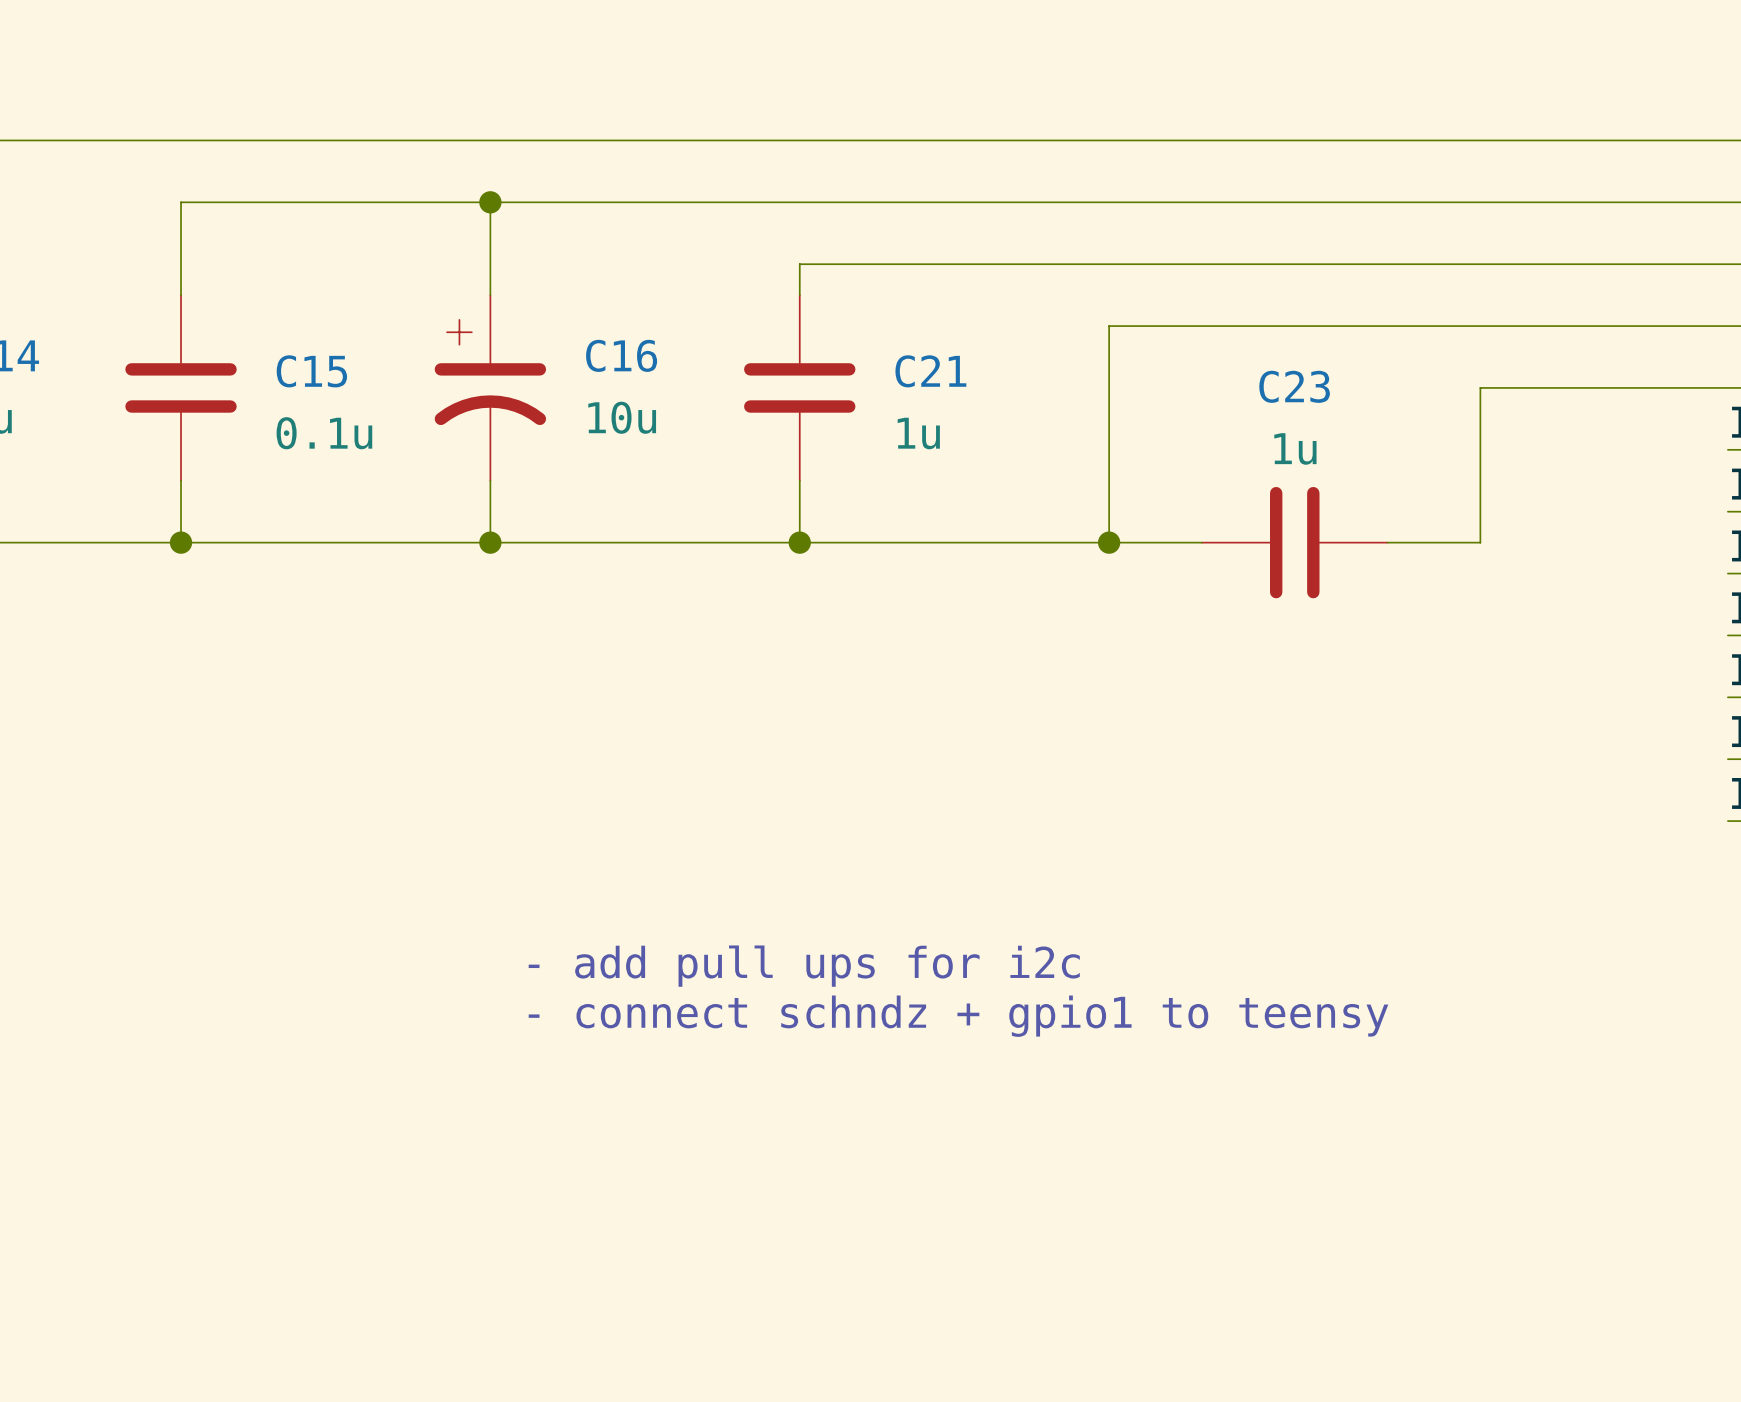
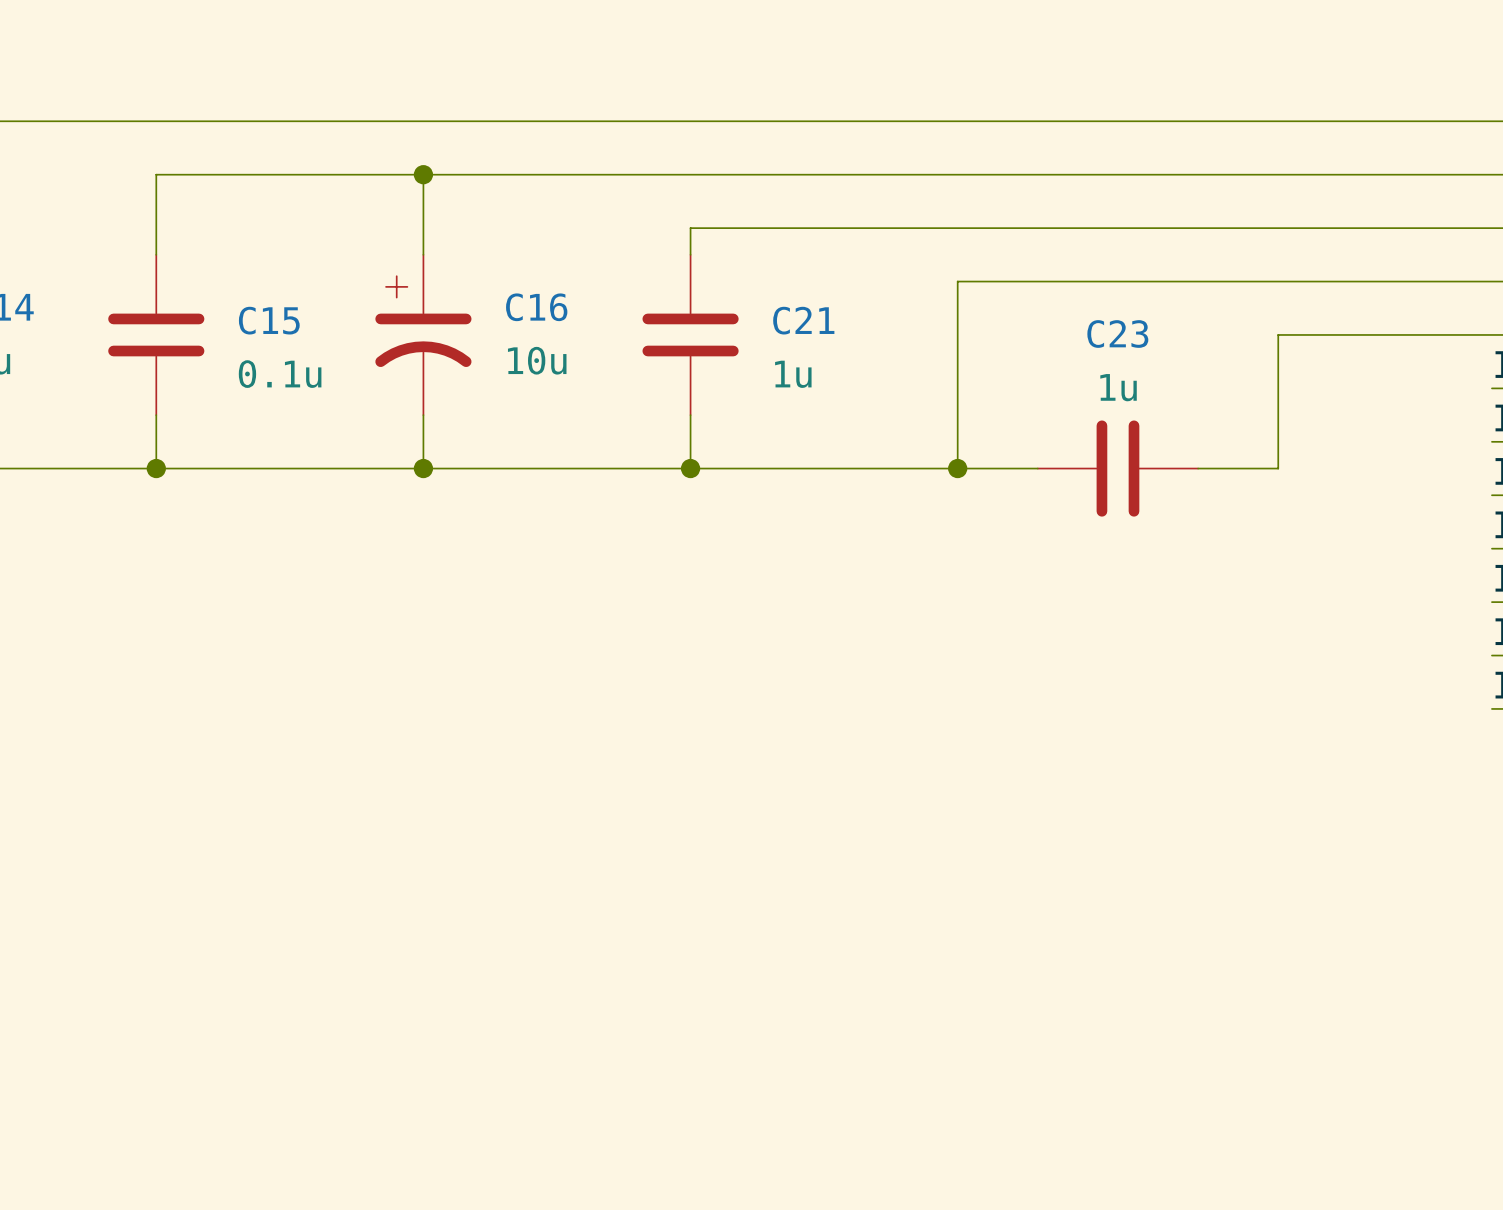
text: - add pull ups for i2c (804, 966) -> none
text: - connect schndz + gpio1 to teensy (958, 1016) -> none

